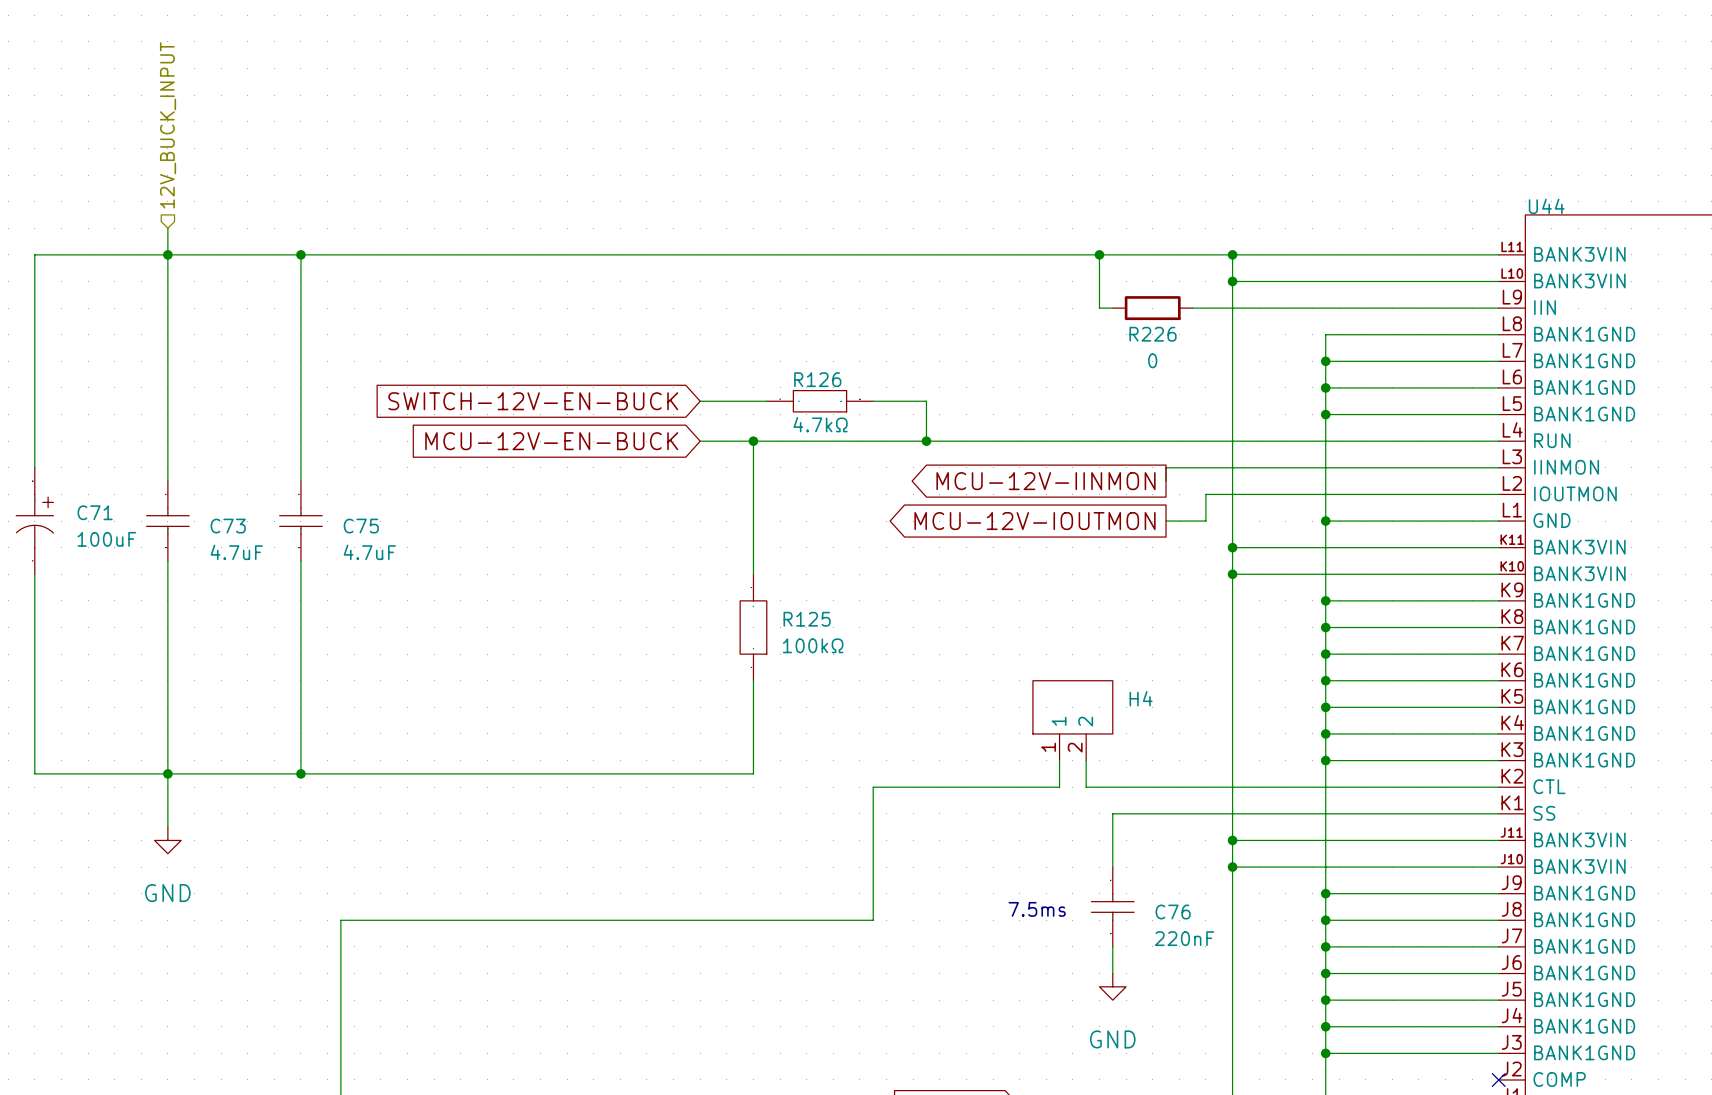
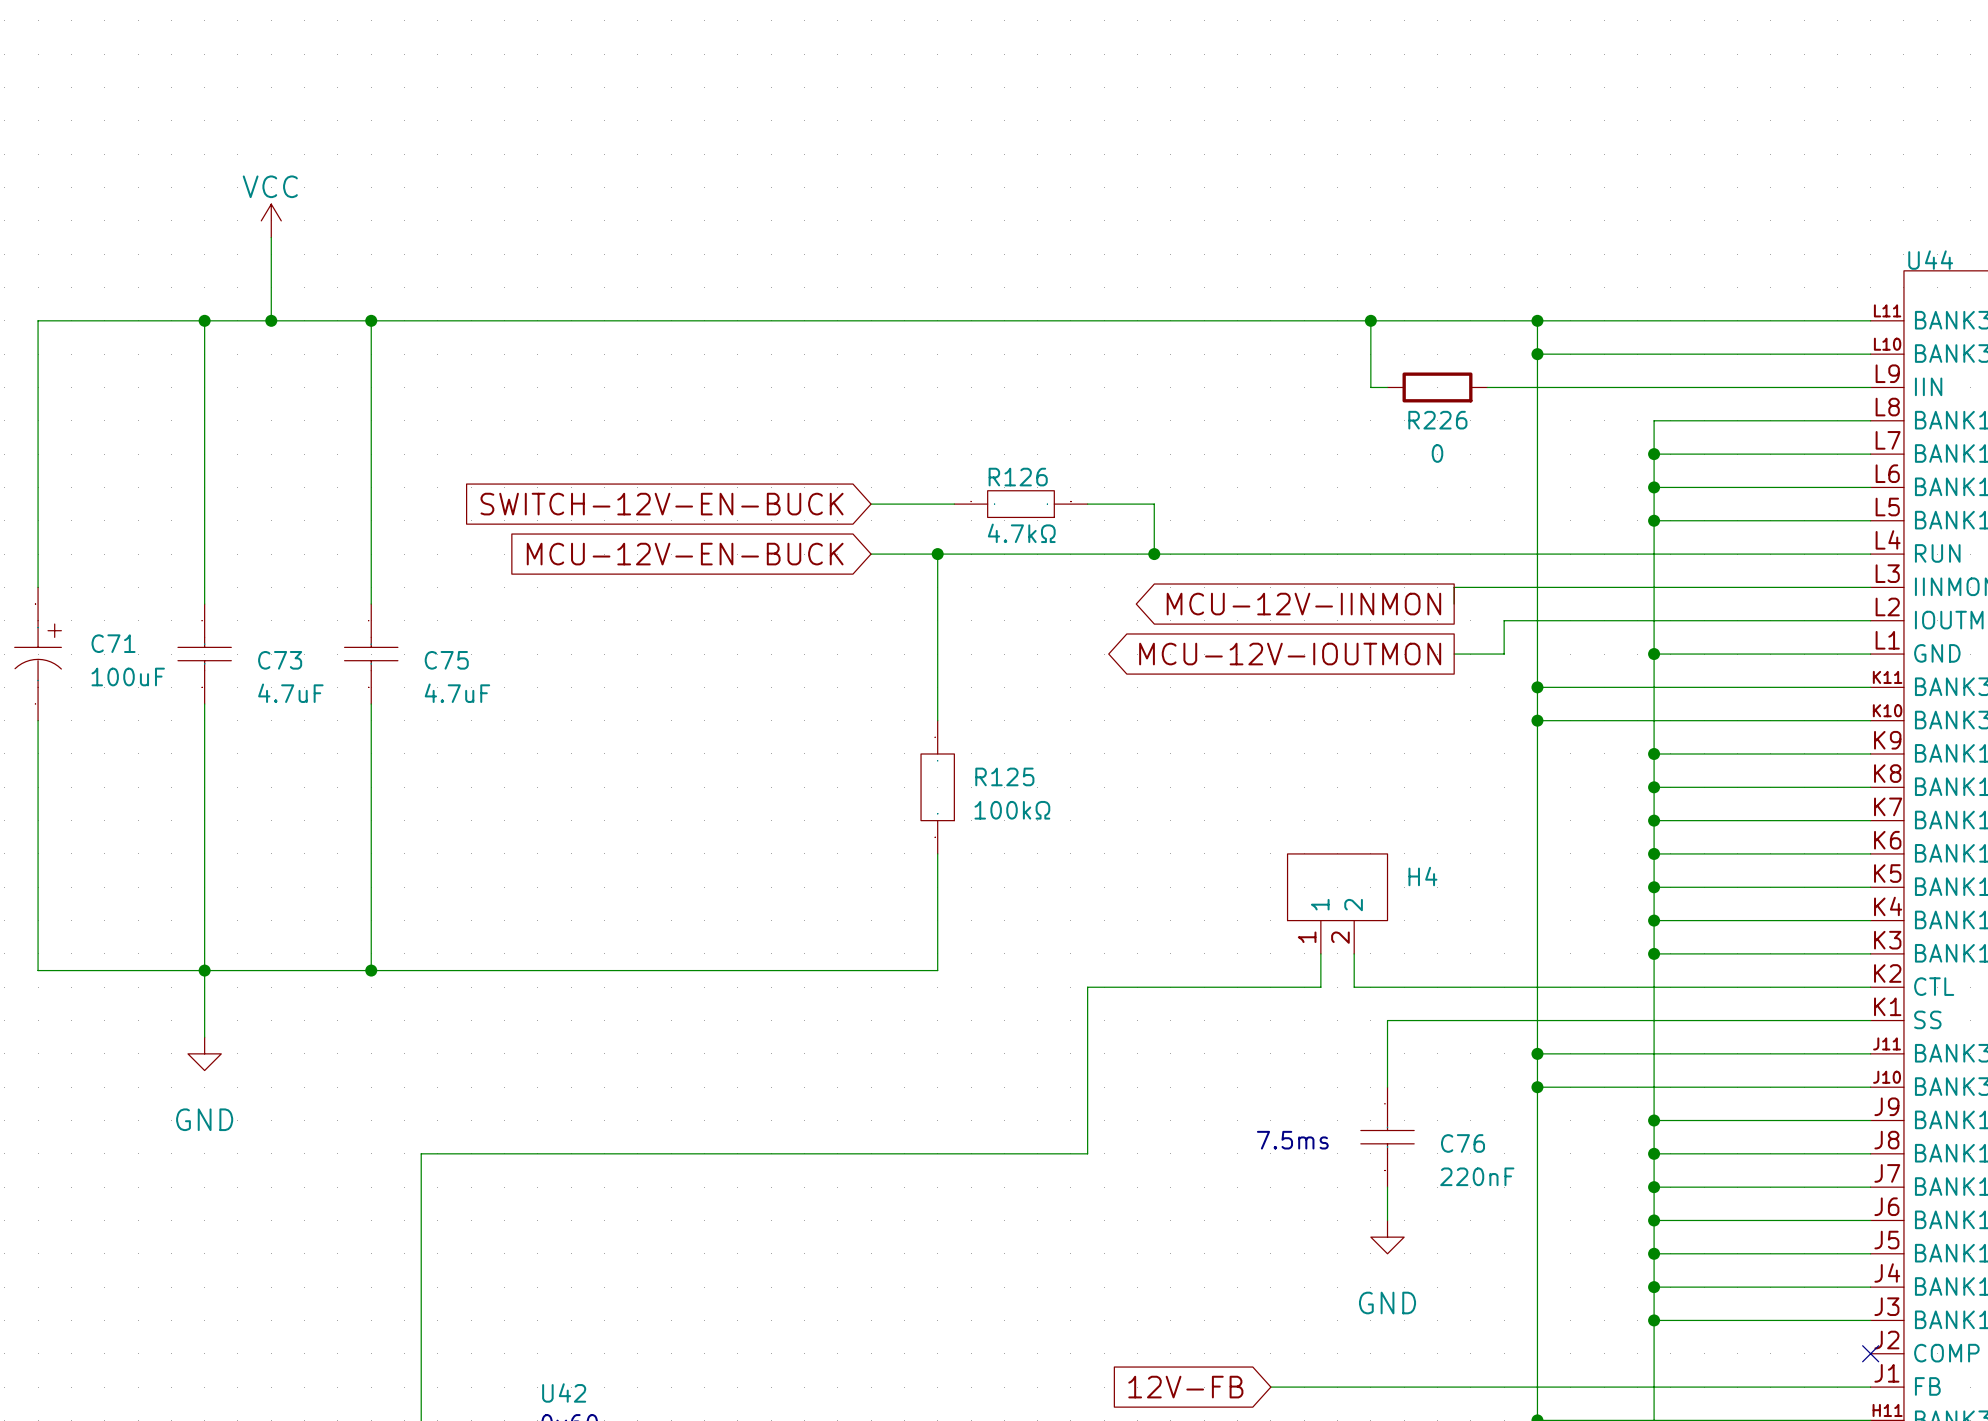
hierarchical label: 12V_BUCK_INPUT (168, 125) -> none
power symbol: none -> VCC (271, 220)
wire: none -> (271, 237) (271, 320)
wire: (167, 228) (167, 254) -> none
junction: none -> (271, 320)

